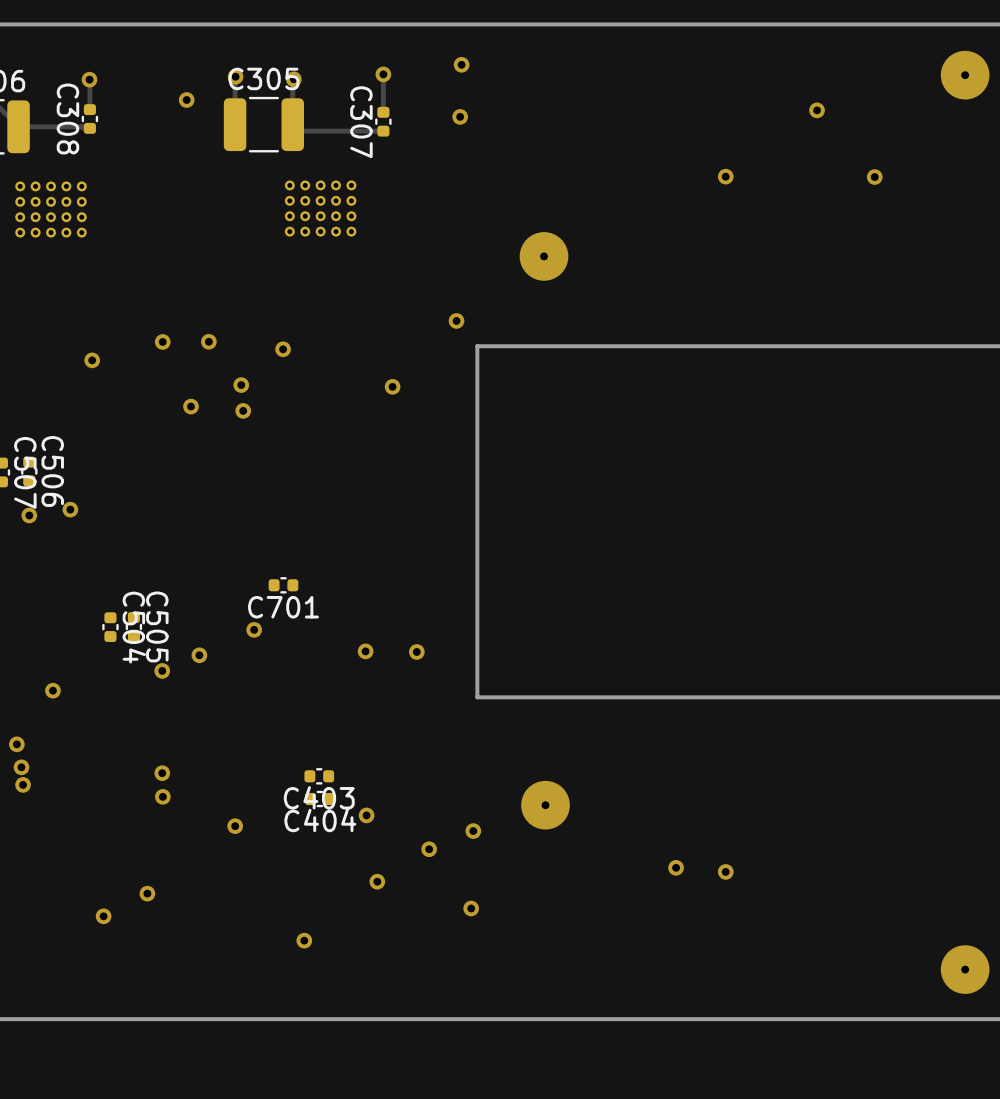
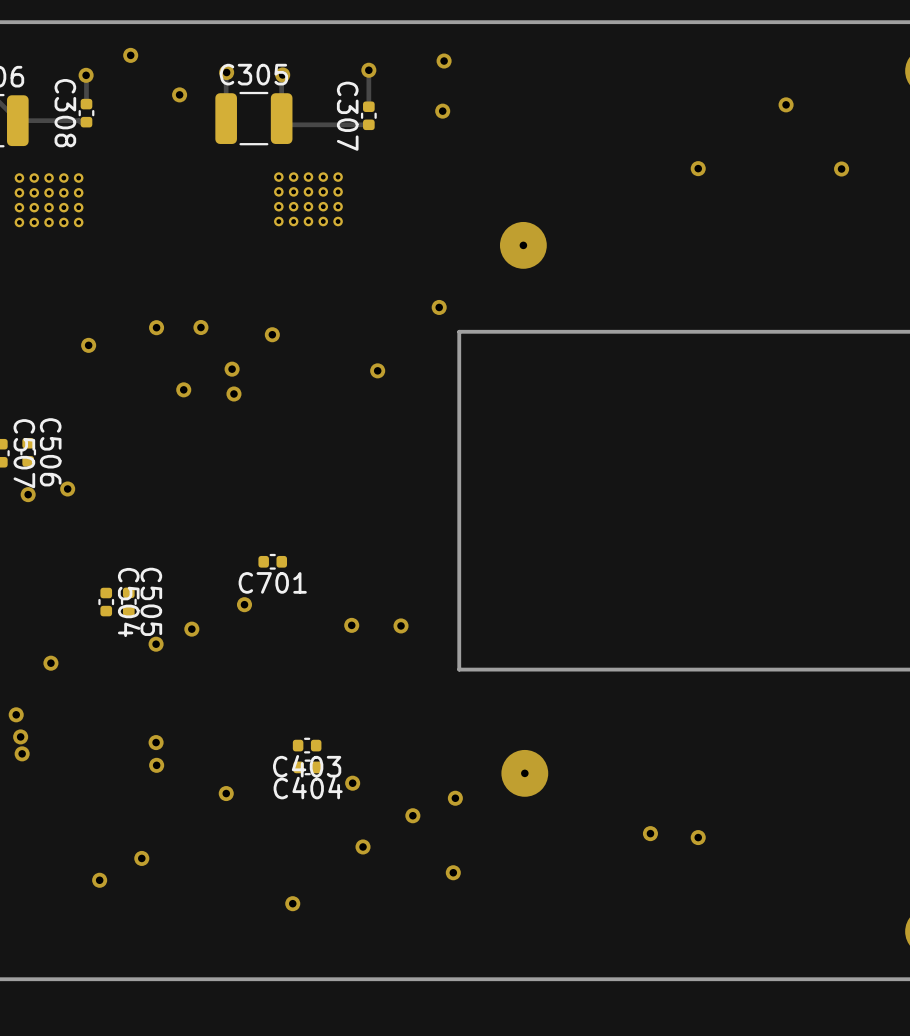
via: none -> (130, 55)

